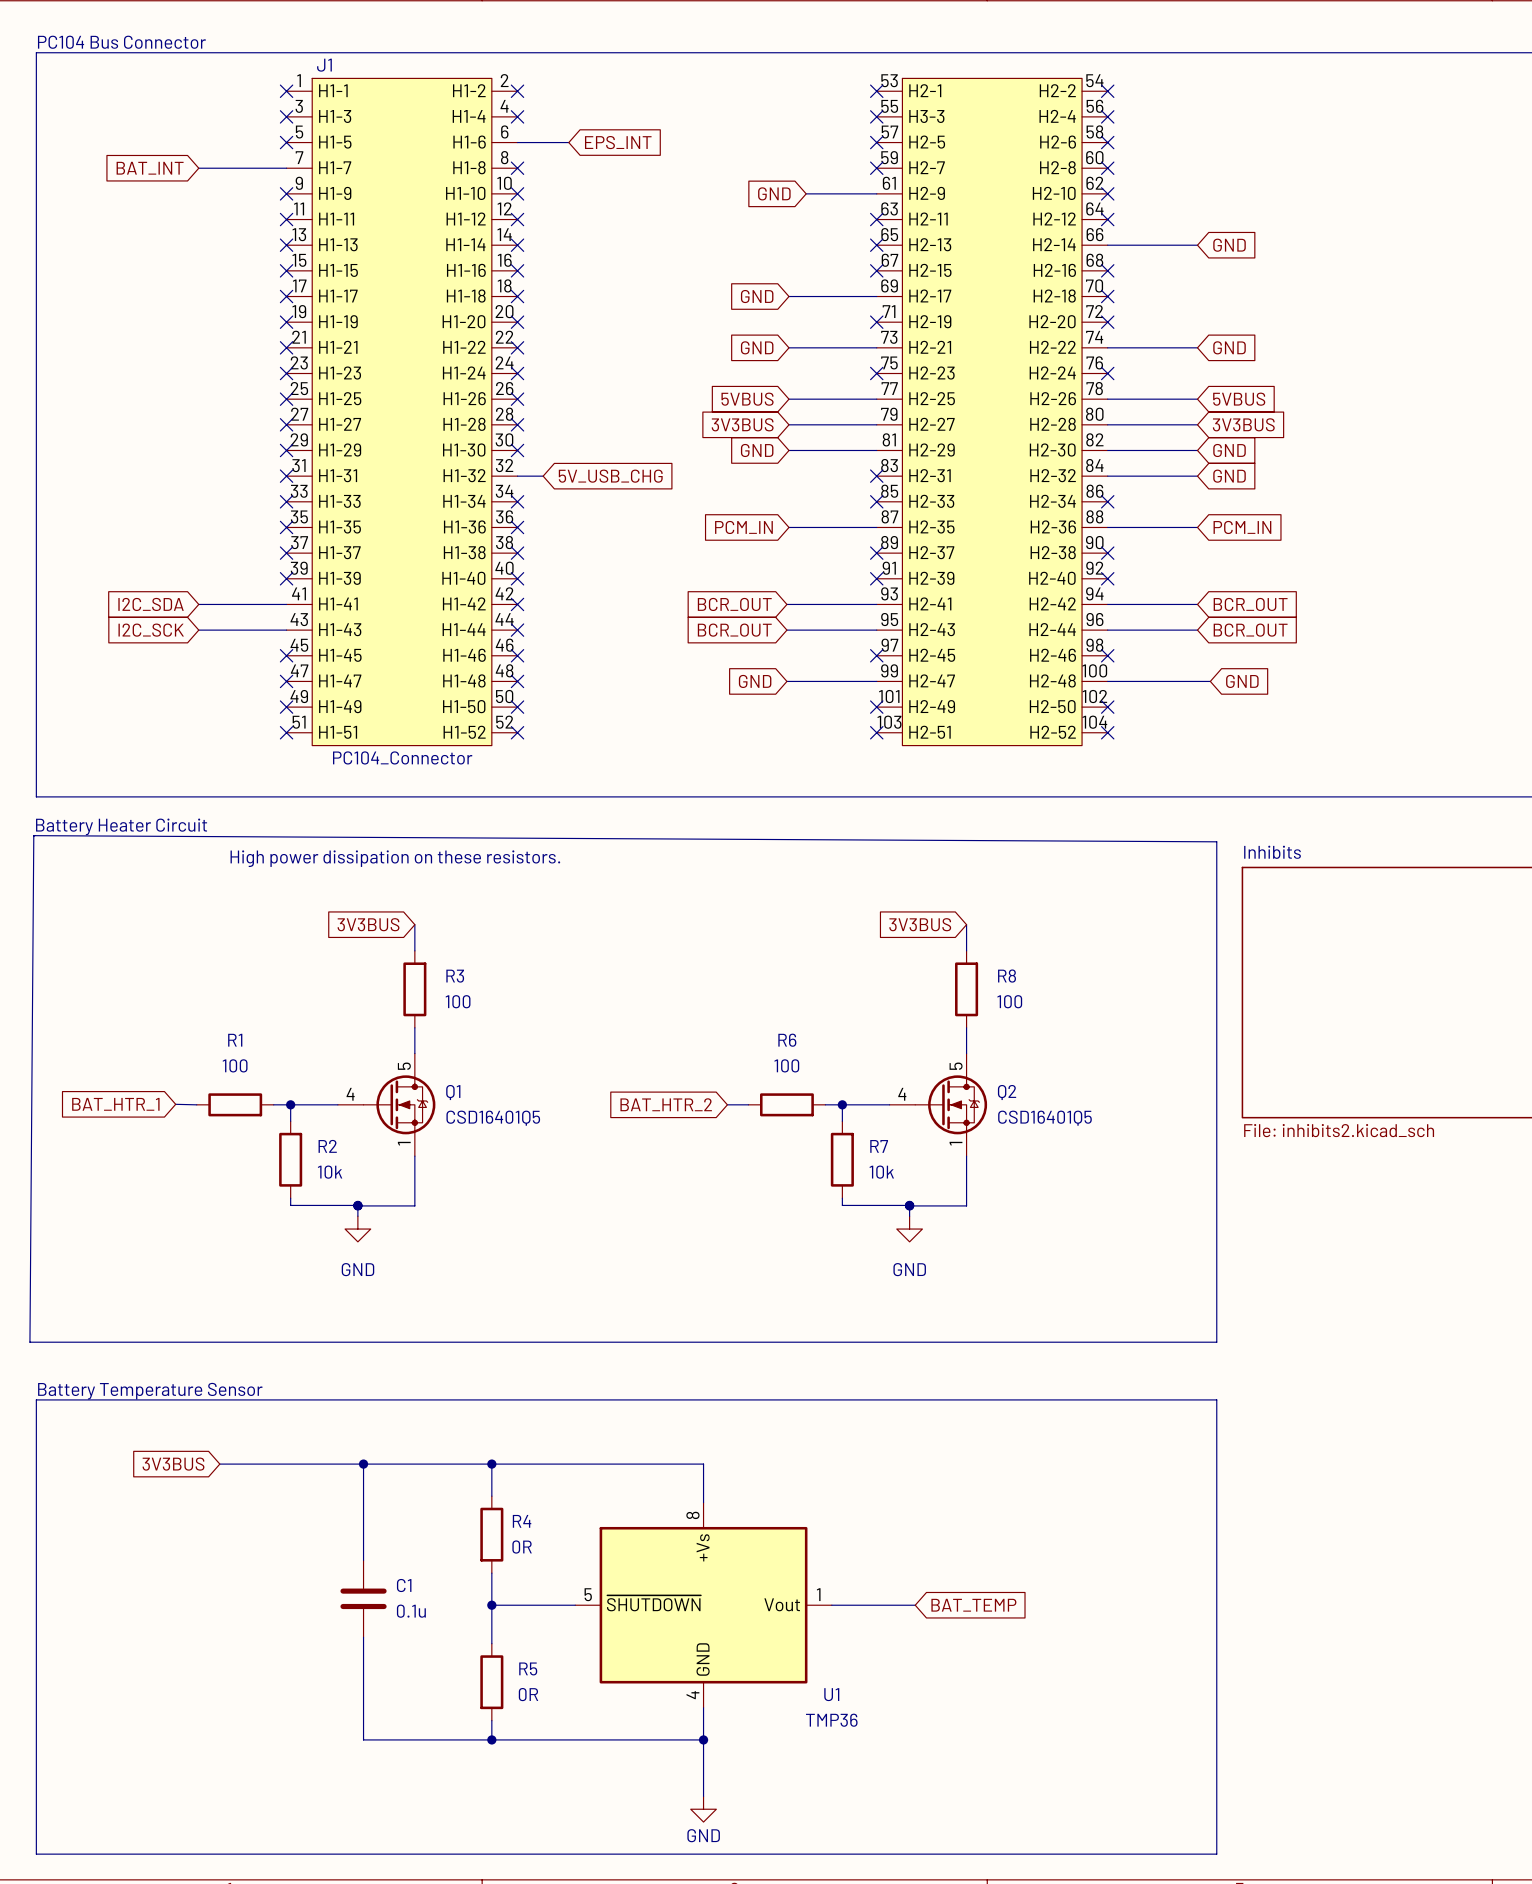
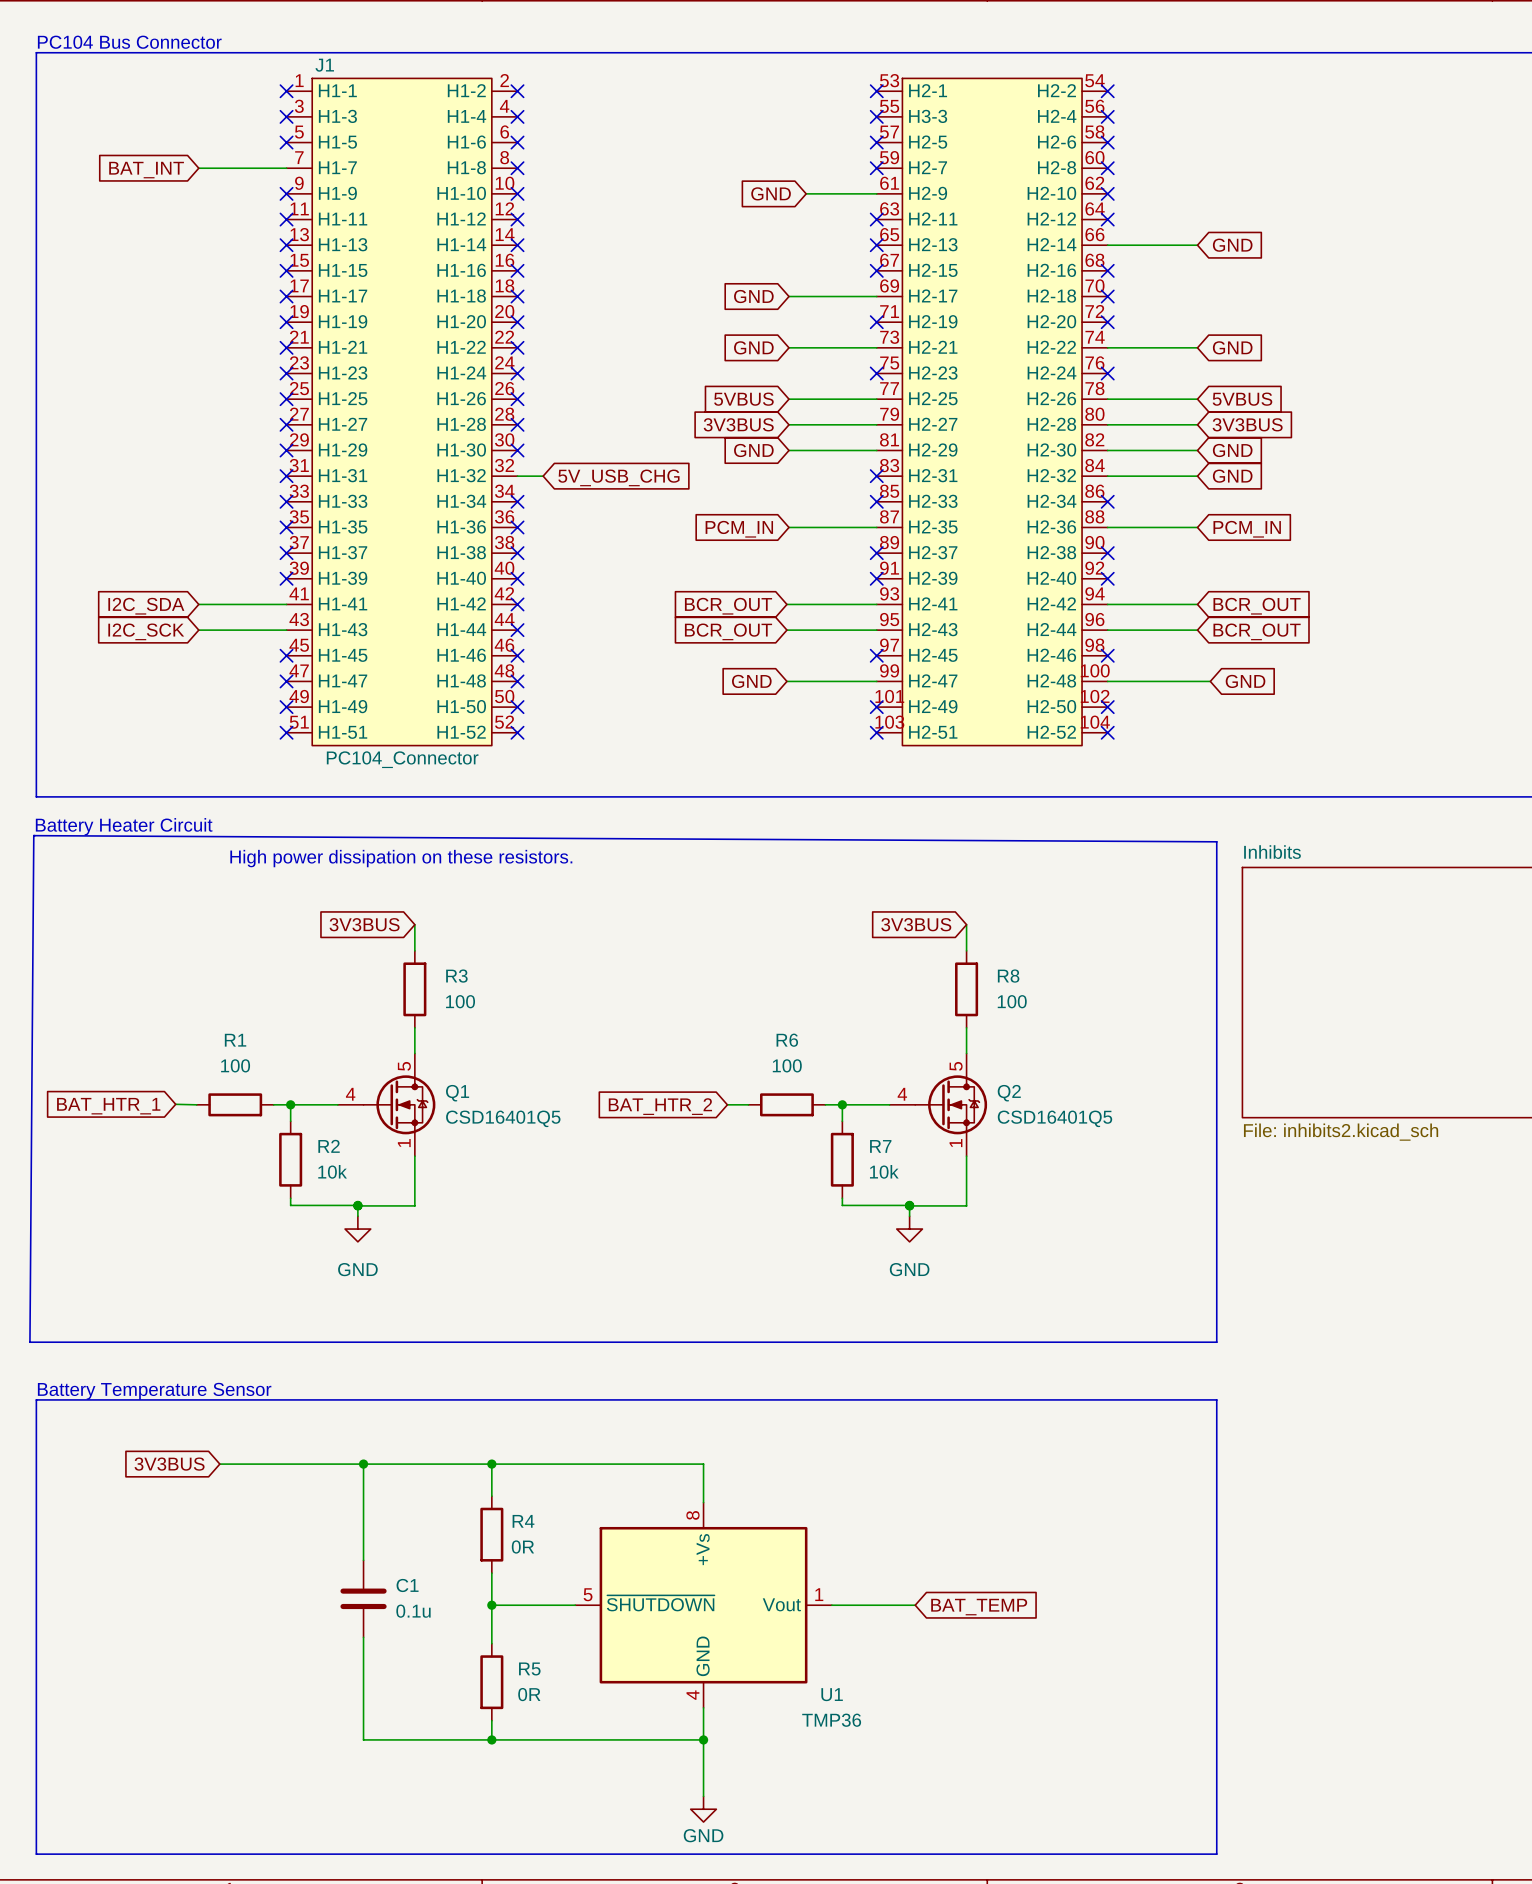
wire: (517, 142) (568, 142) -> none
no-connect mark: none -> (517, 142)
global label: EPS_INT (618, 142) -> none

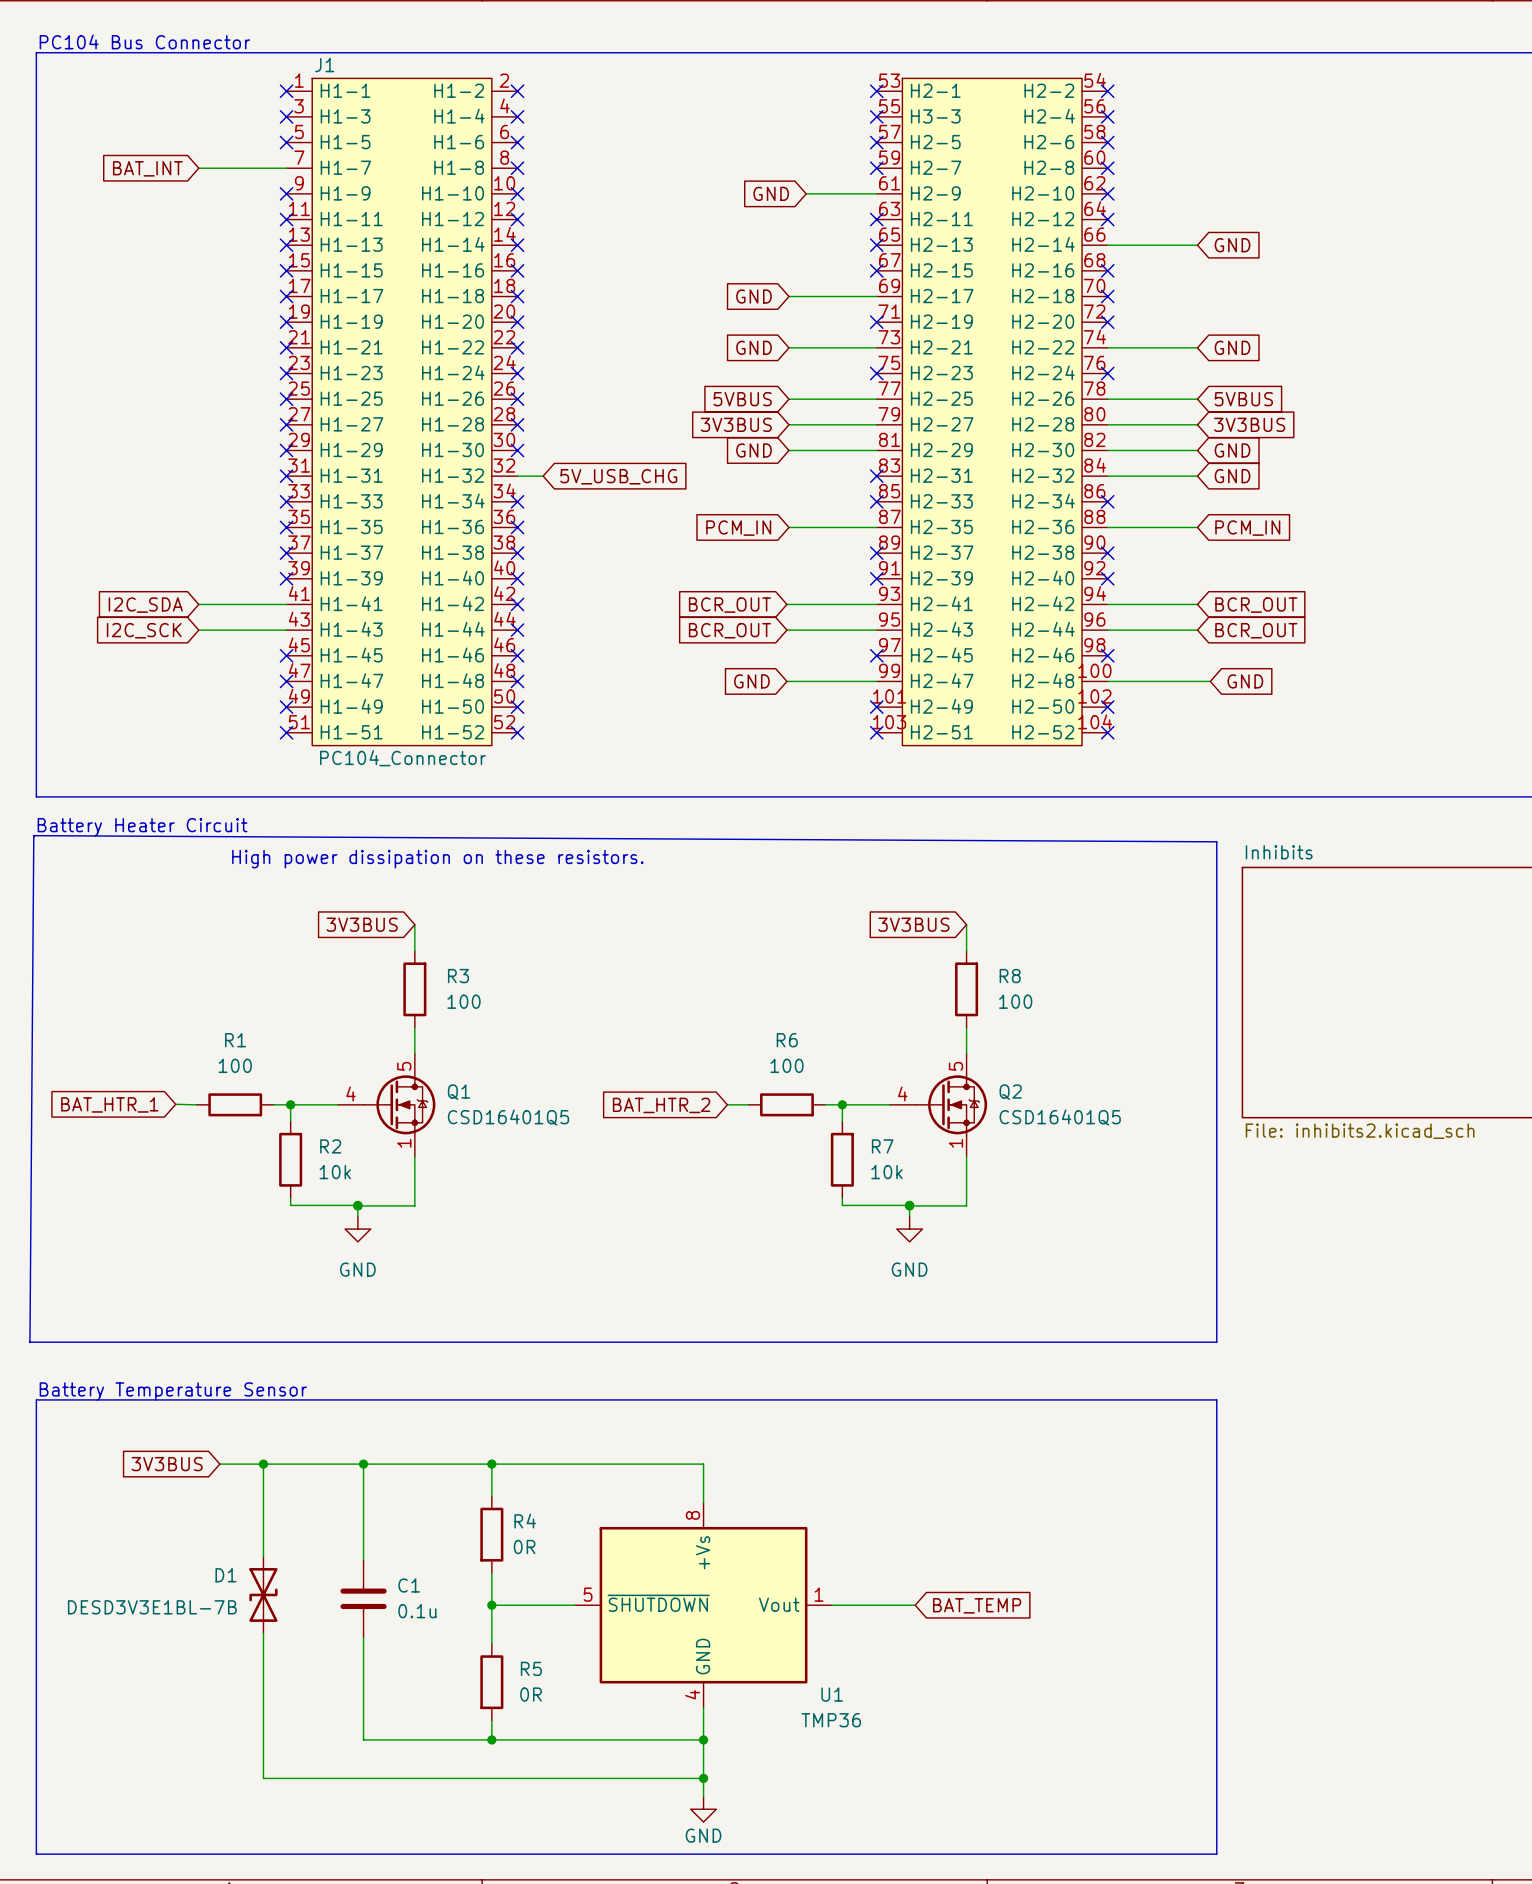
wire: none -> (263, 1464) (263, 1556)
junction: none -> (263, 1464)
D1: none -> DESD3V3E1BL-7B (263, 1594)
wire: none -> (263, 1633) (263, 1778) (703, 1778)
junction: none -> (703, 1778)

